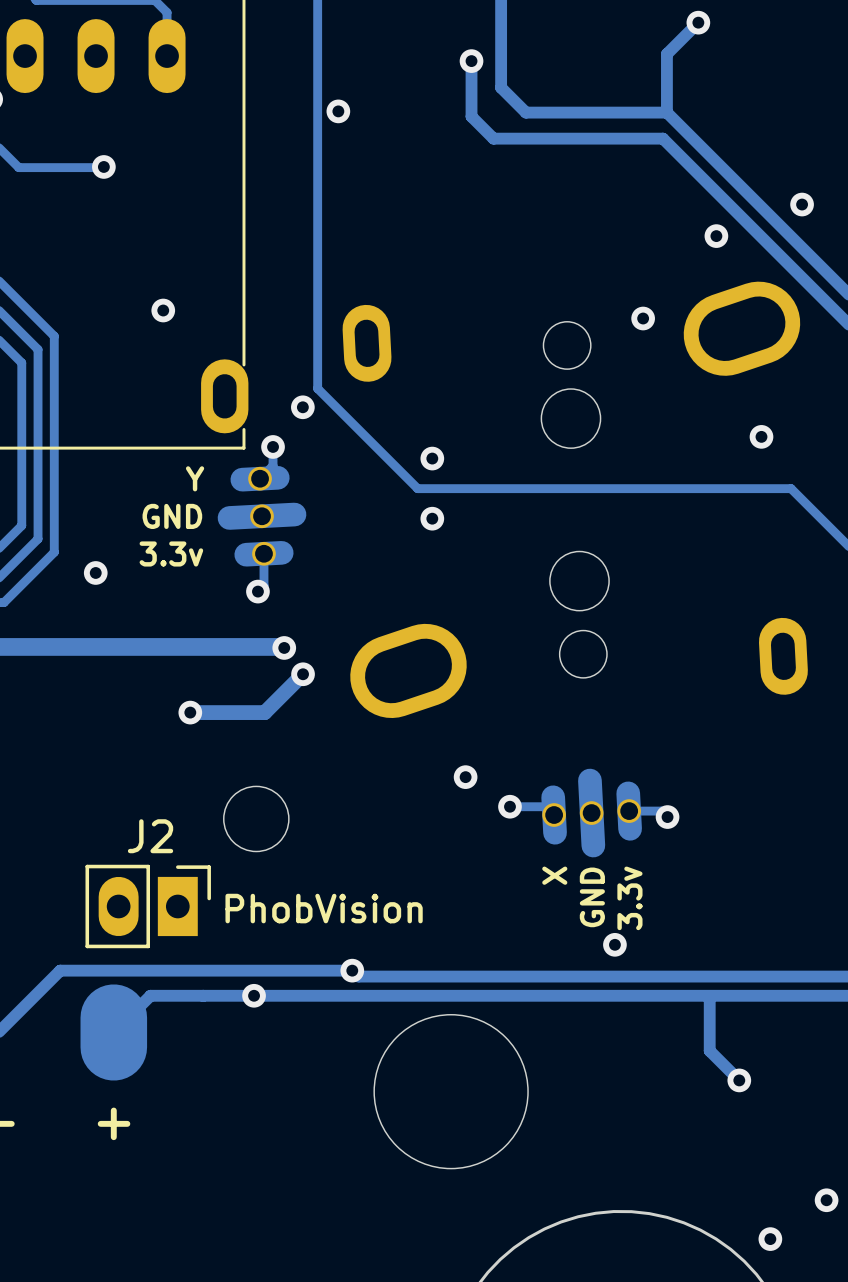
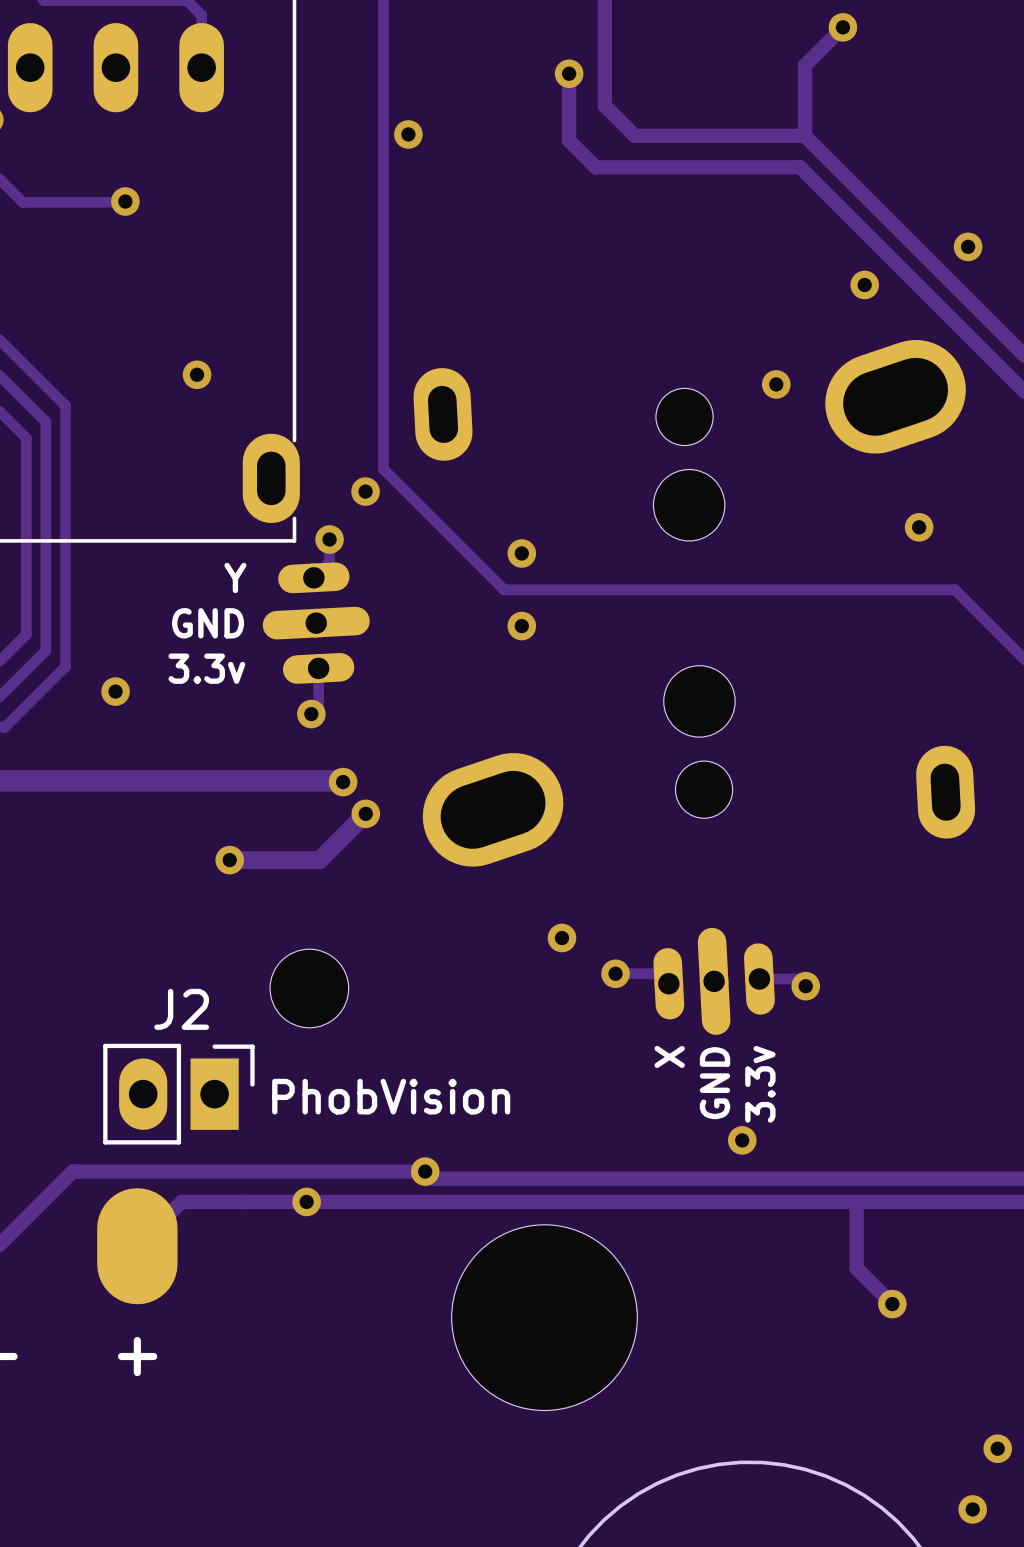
via position: (770, 1239) -> (972, 1509)

